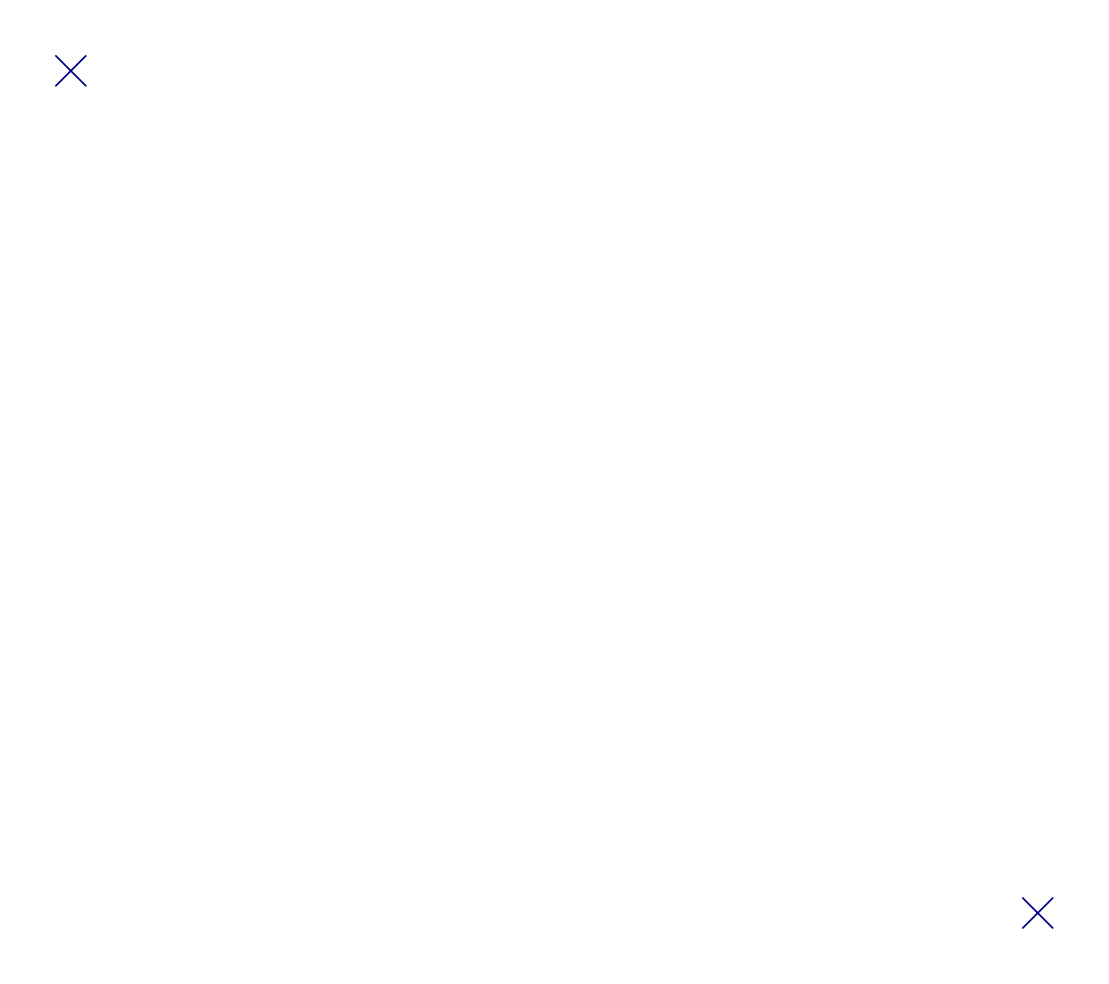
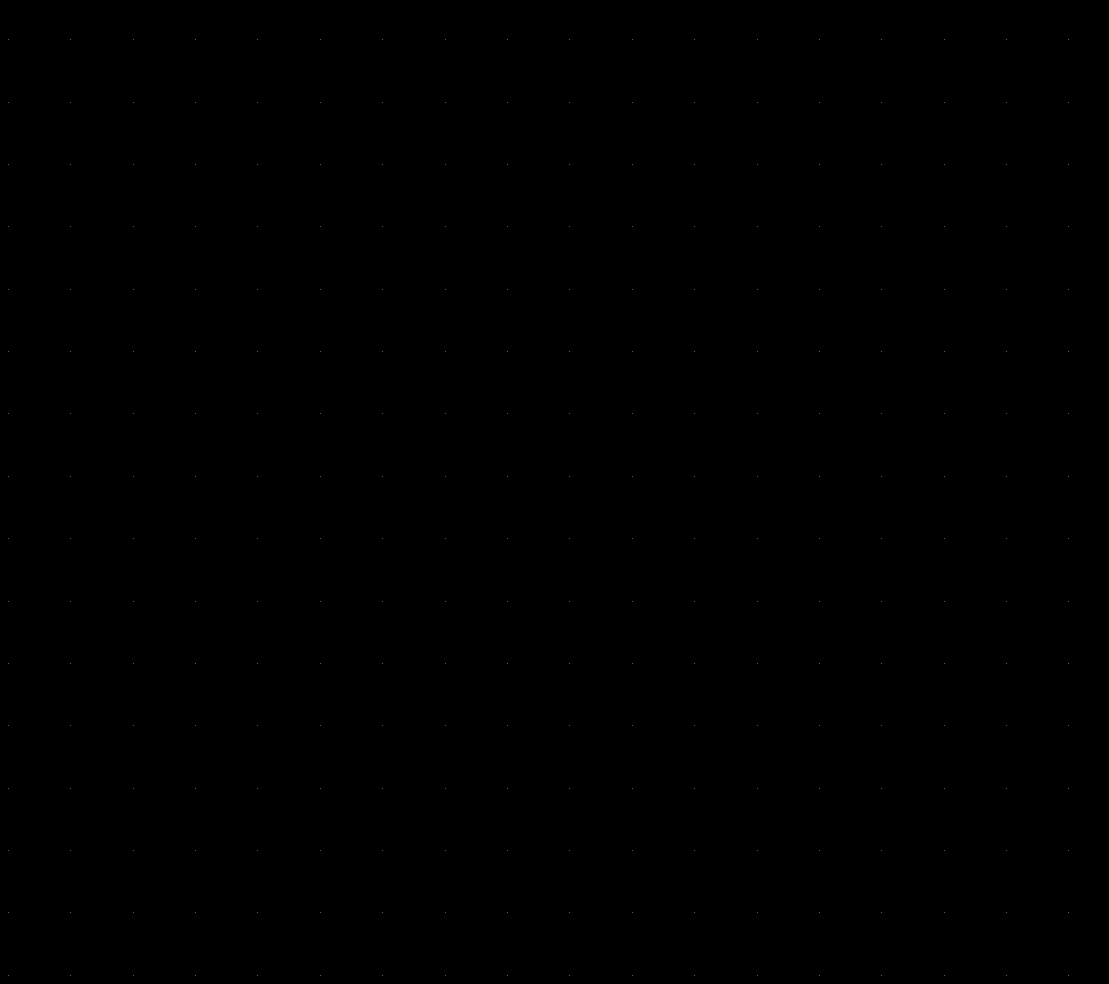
no-connect mark: (70, 70) -> none
no-connect mark: (1037, 912) -> none

